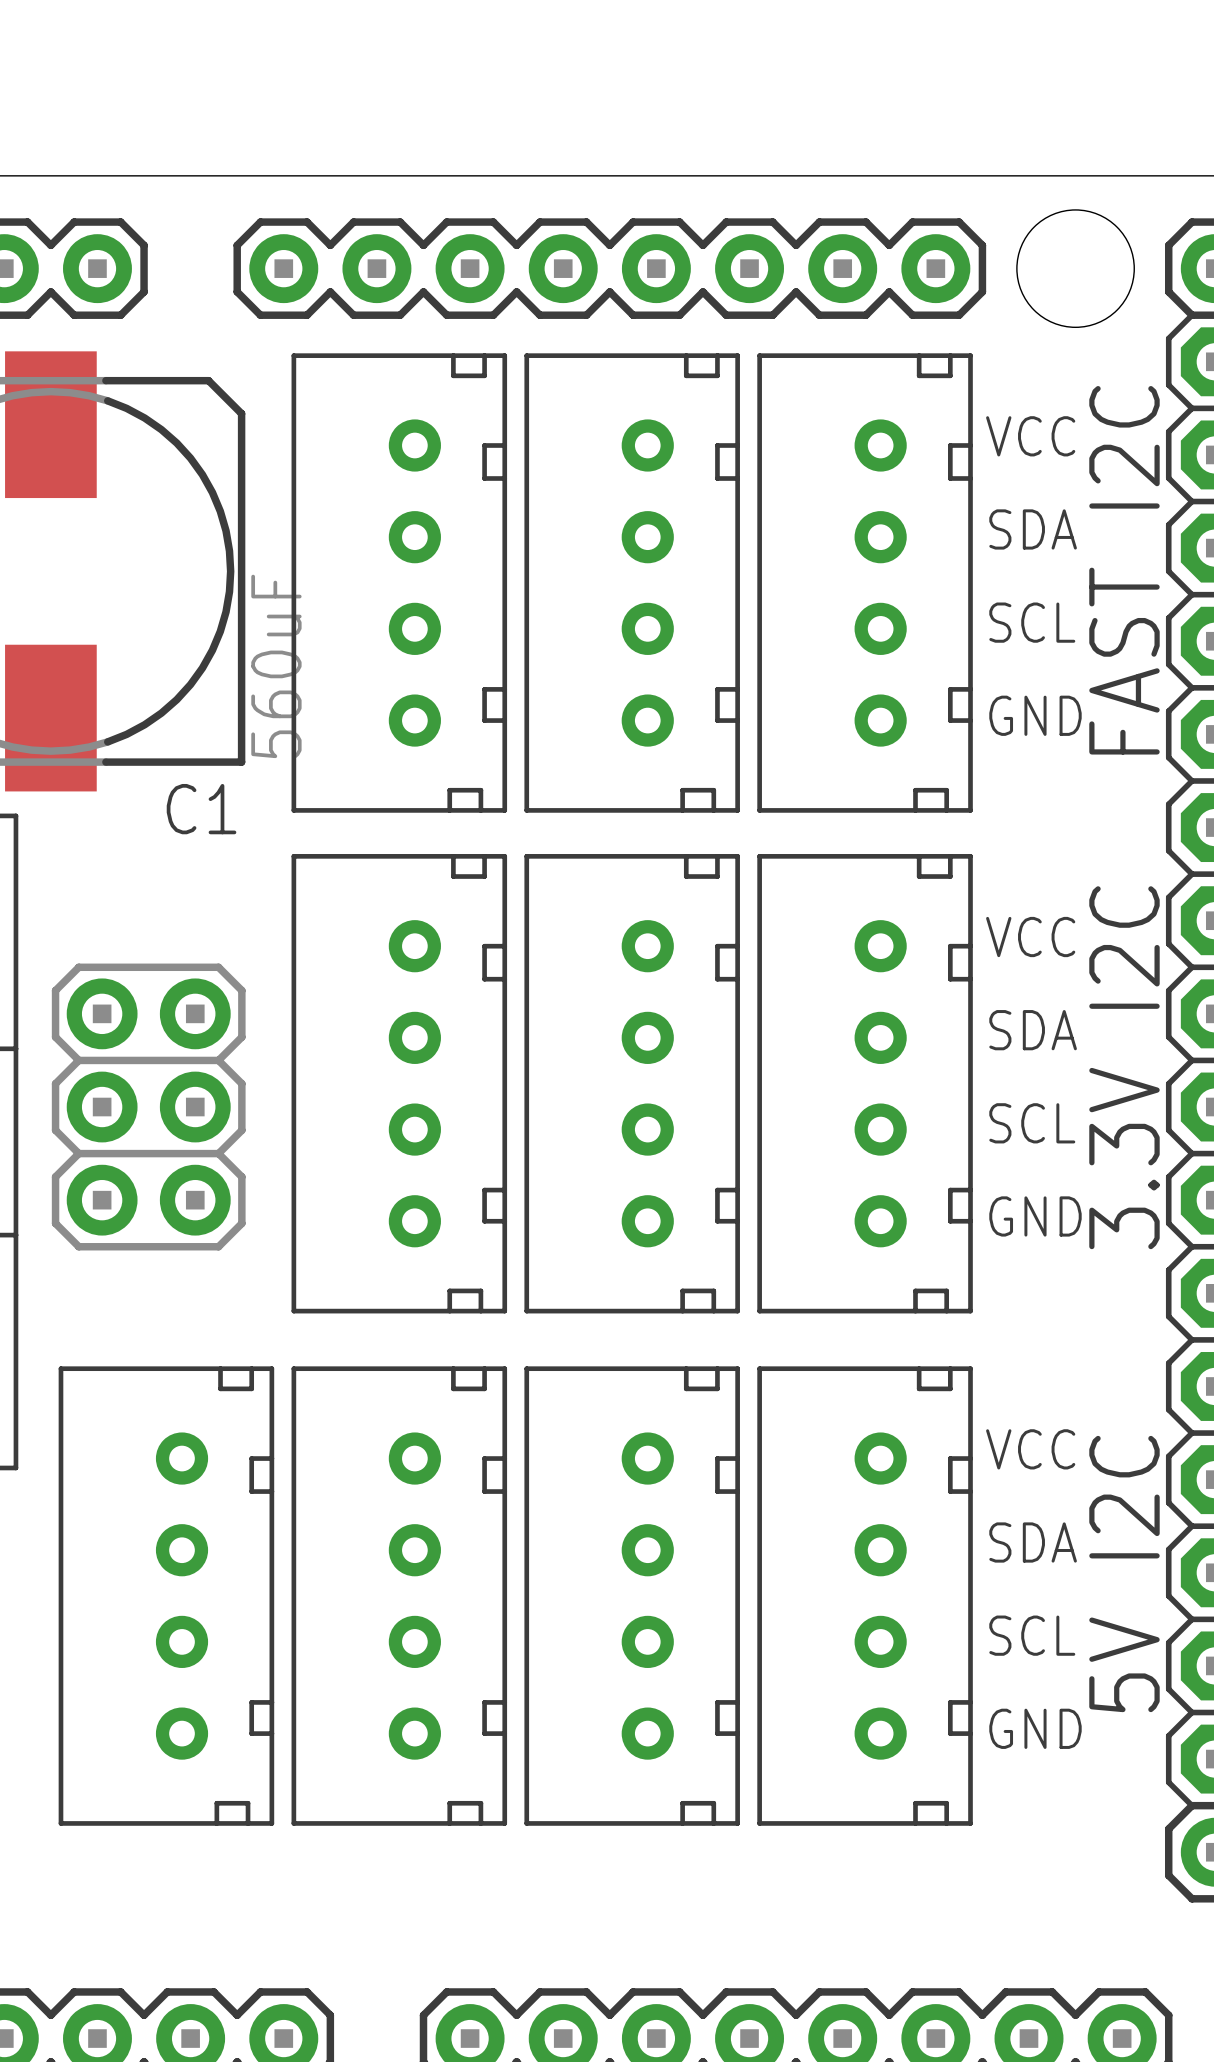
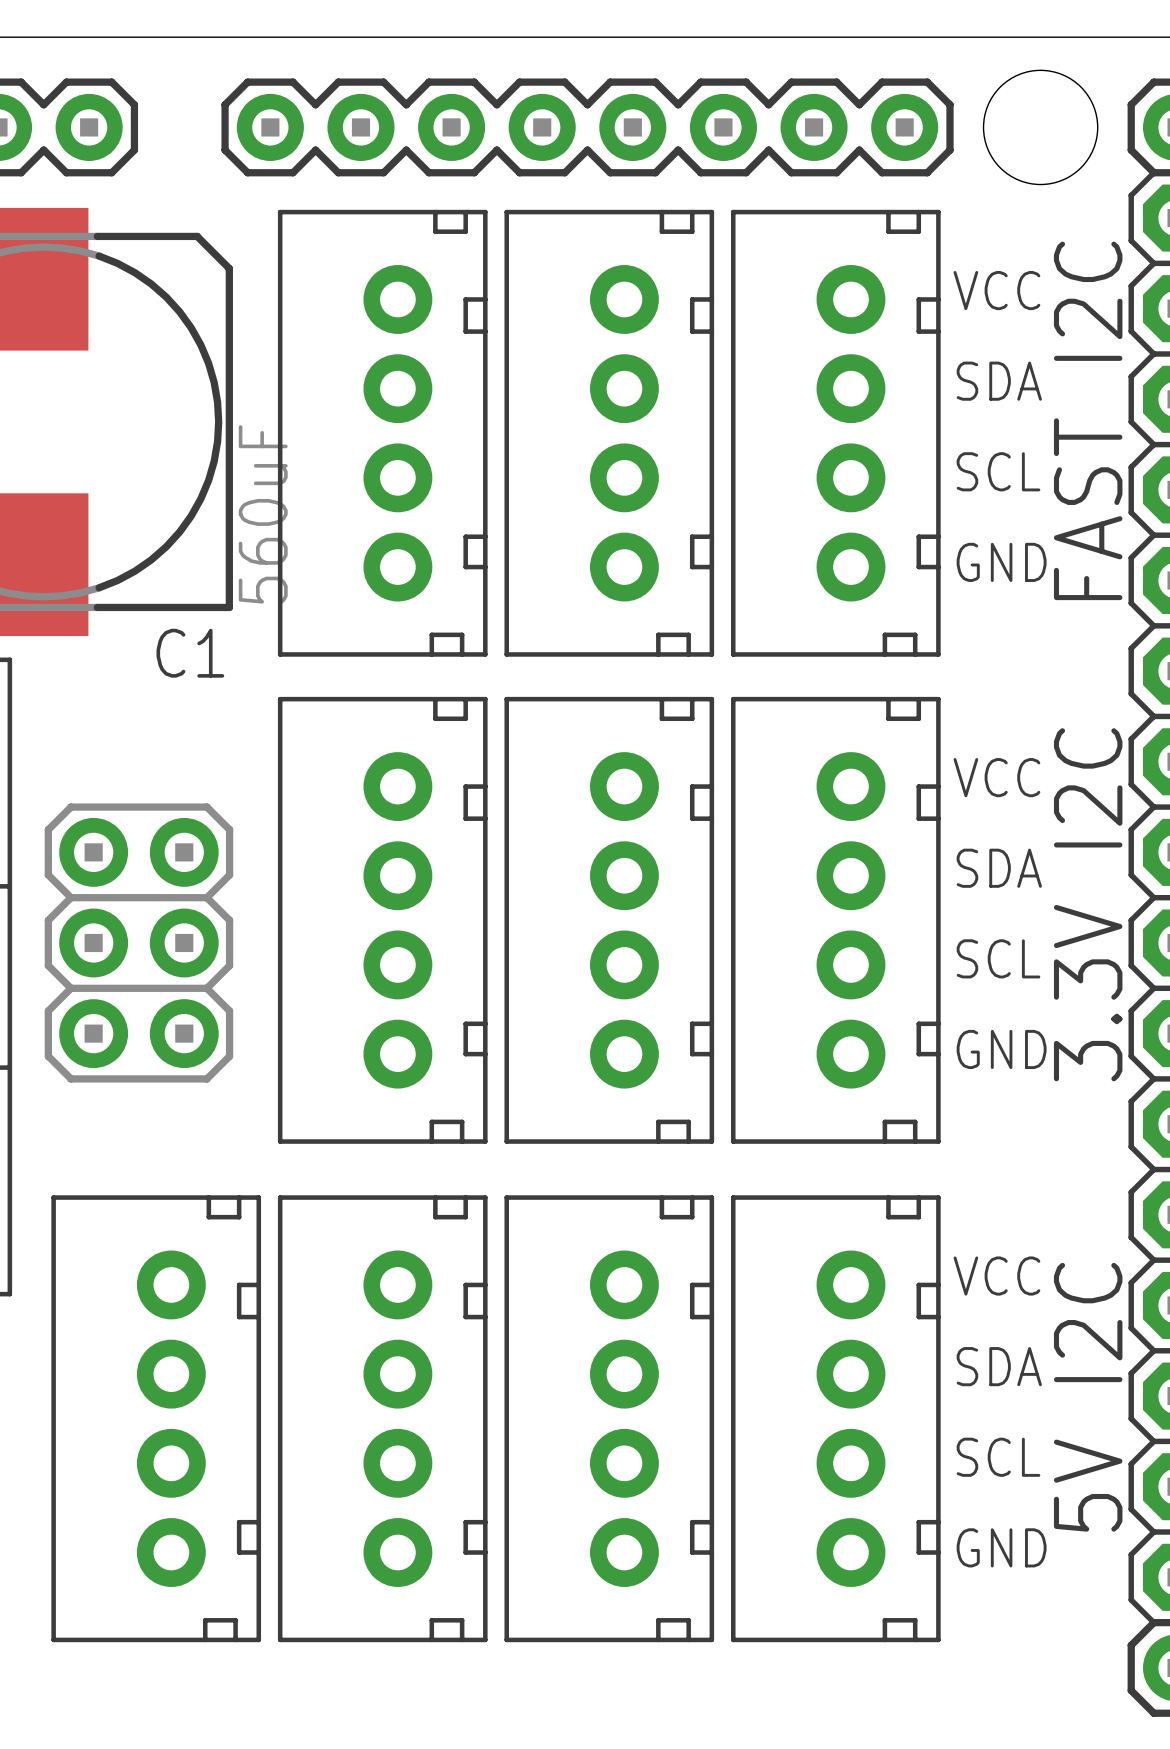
part footprint: [291, 353, 508, 813] -> [277, 209, 488, 657]
part footprint: [524, 353, 740, 813] -> [504, 209, 715, 657]
part footprint: [757, 353, 973, 813] -> [730, 209, 941, 657]
part footprint: [291, 854, 508, 1314] -> [277, 696, 488, 1144]
part footprint: [524, 854, 740, 1314] -> [504, 696, 715, 1144]
part footprint: [757, 854, 973, 1314] -> [730, 696, 941, 1144]
part footprint: [58, 1366, 275, 1826] -> [51, 1195, 262, 1643]
part footprint: [291, 1366, 508, 1826] -> [277, 1195, 488, 1643]
part footprint: [524, 1366, 740, 1826] -> [504, 1195, 715, 1643]
part footprint: [757, 1366, 973, 1826] -> [730, 1195, 941, 1643]

